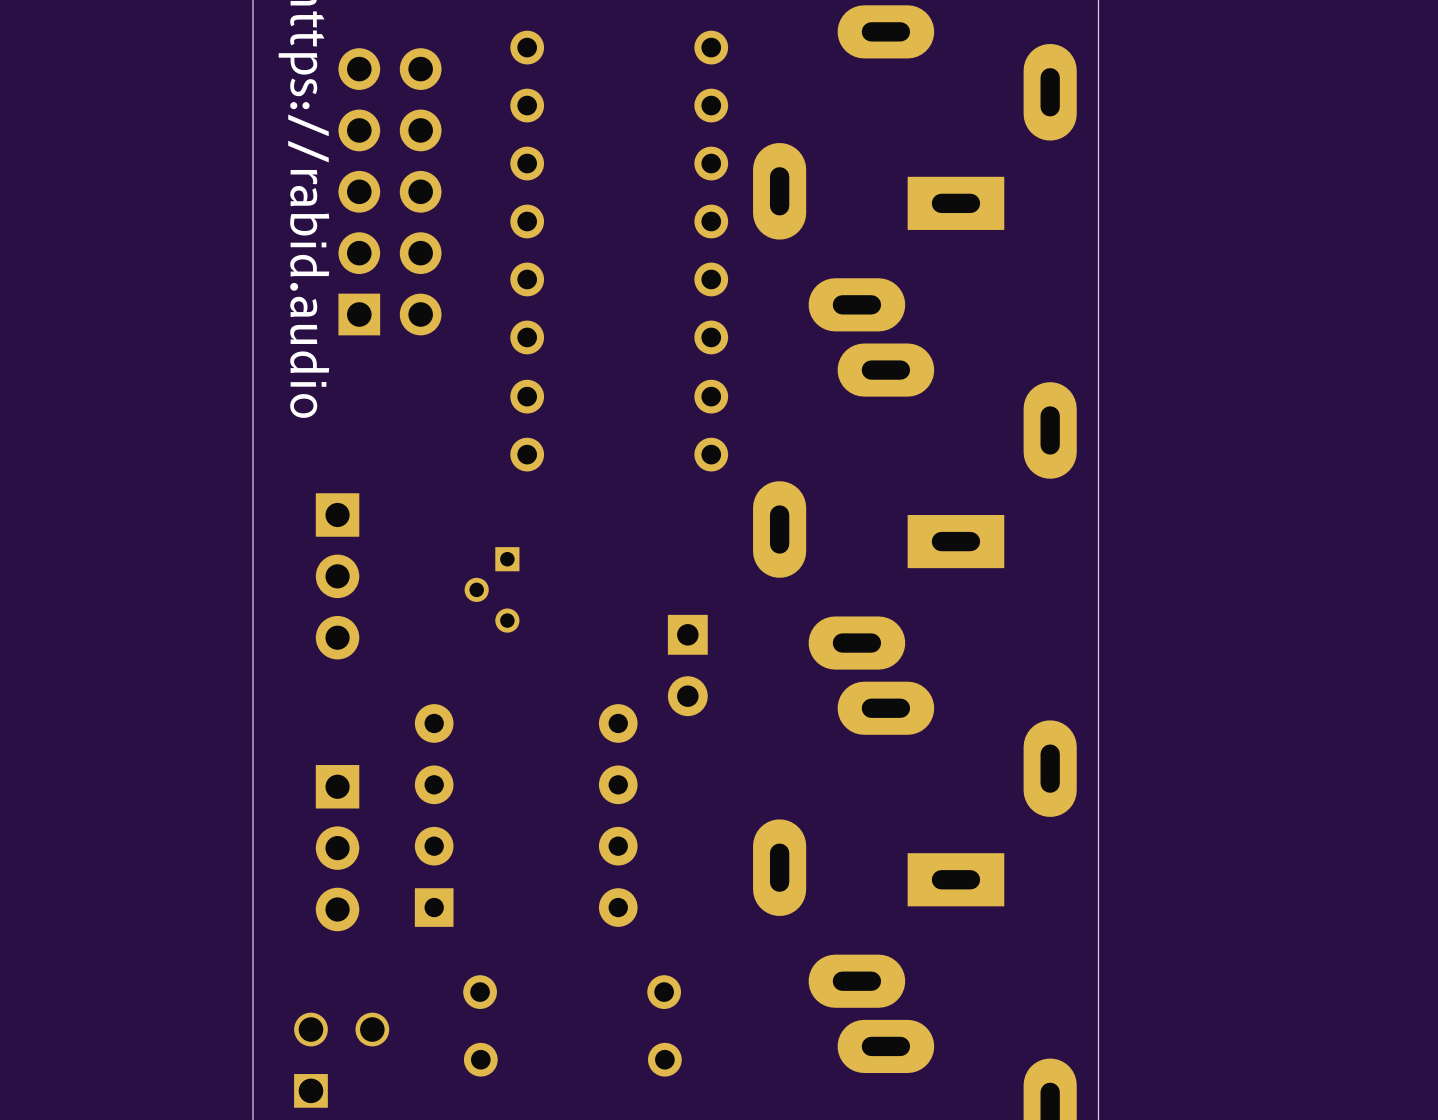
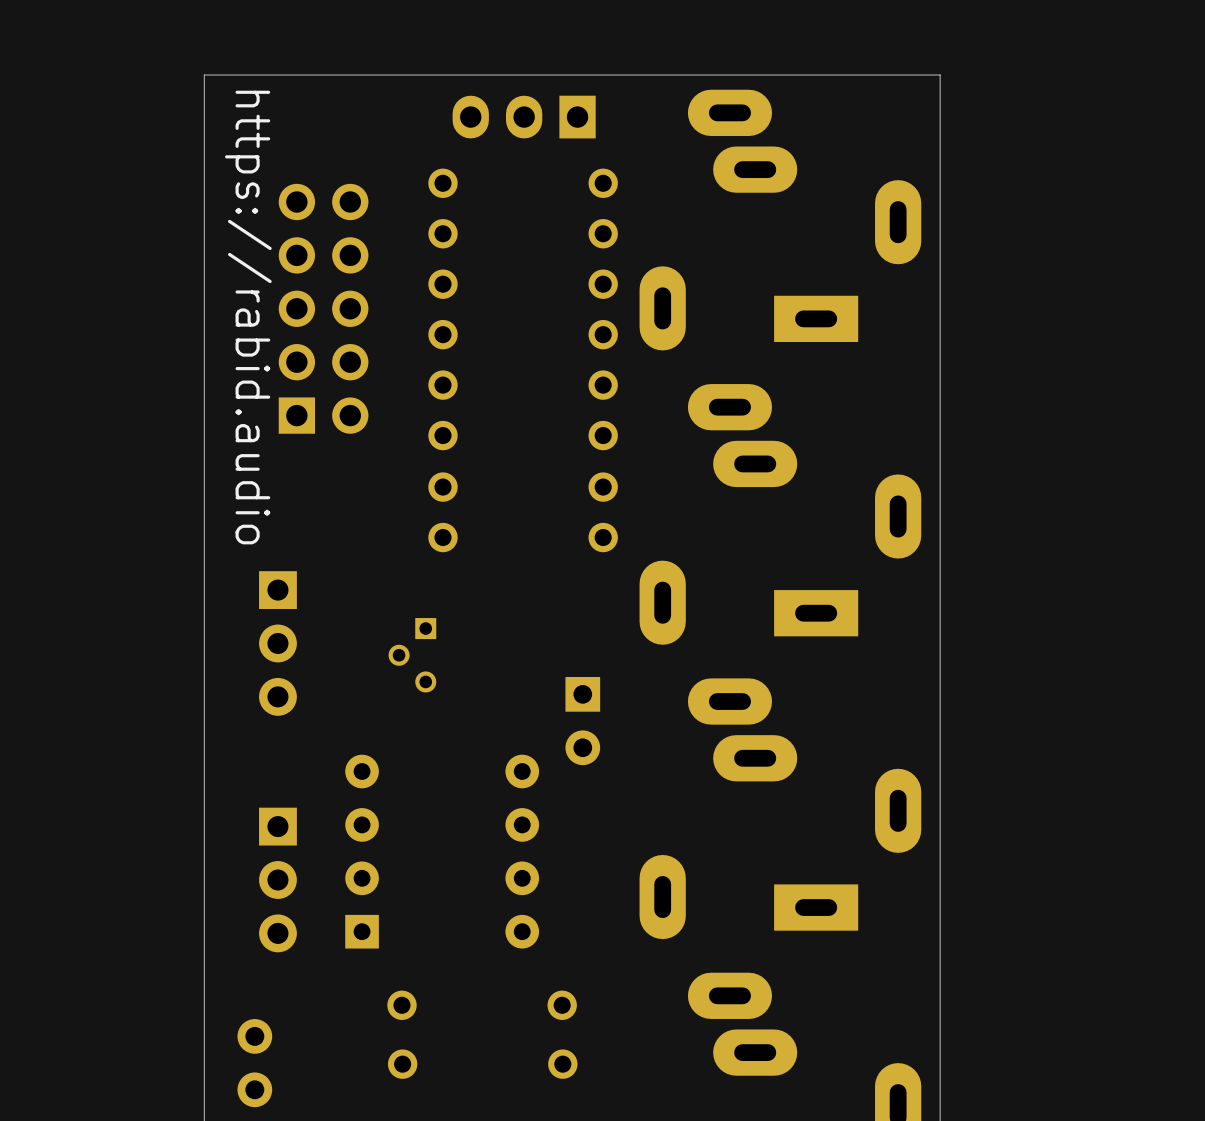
part: none -> (254, 1063)
part: (341, 1060) -> none

